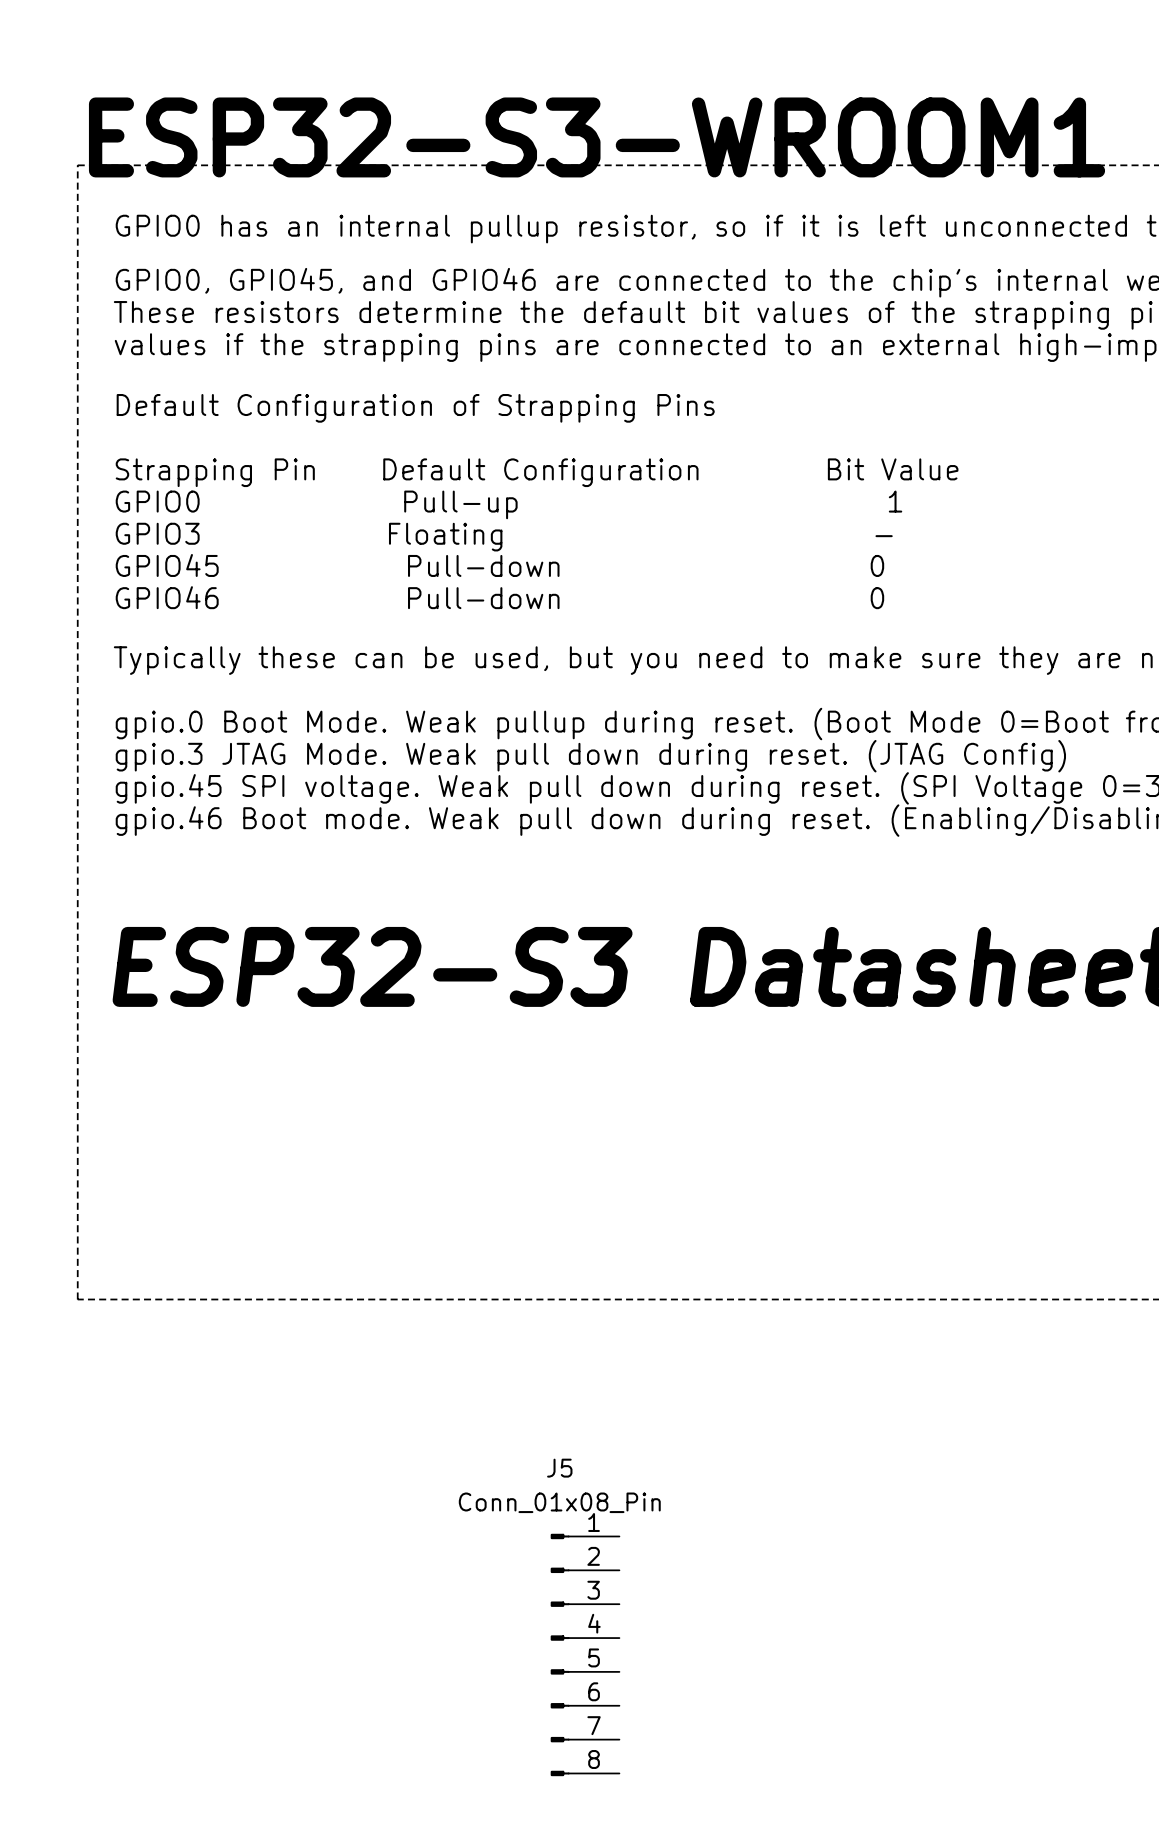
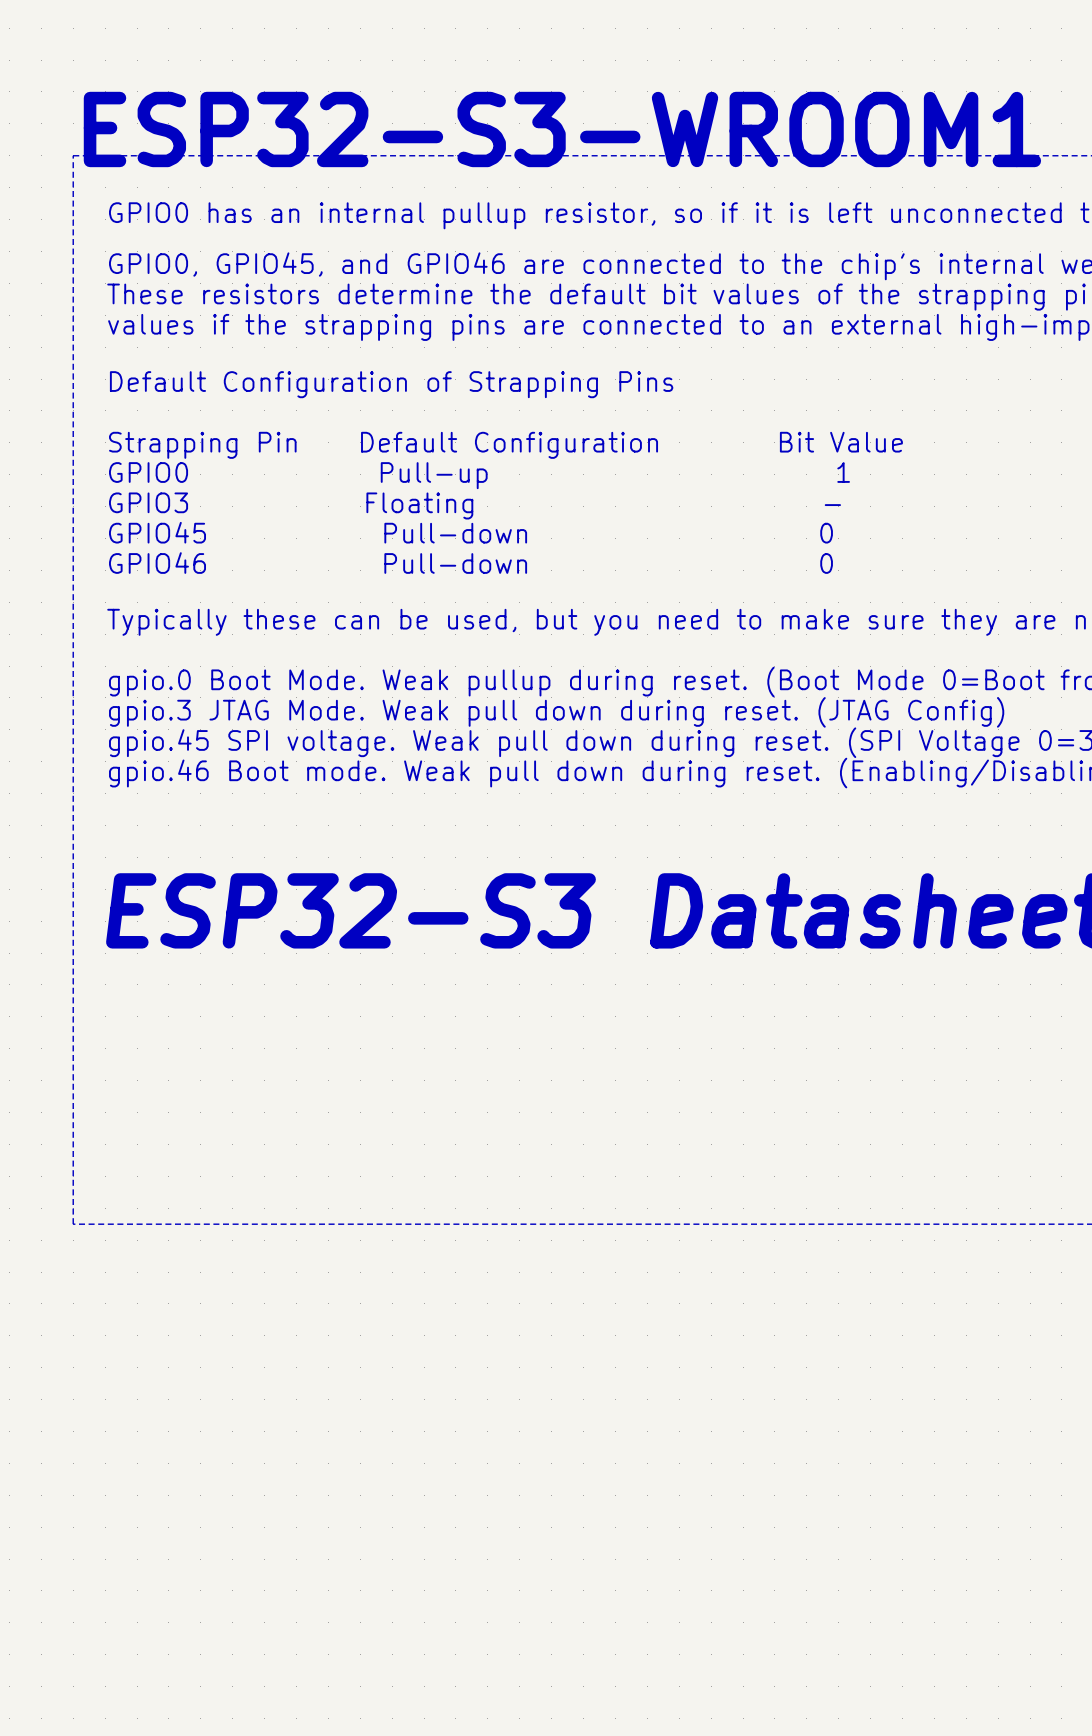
J5: Conn_01x08_Pin (585, 1654) -> none

